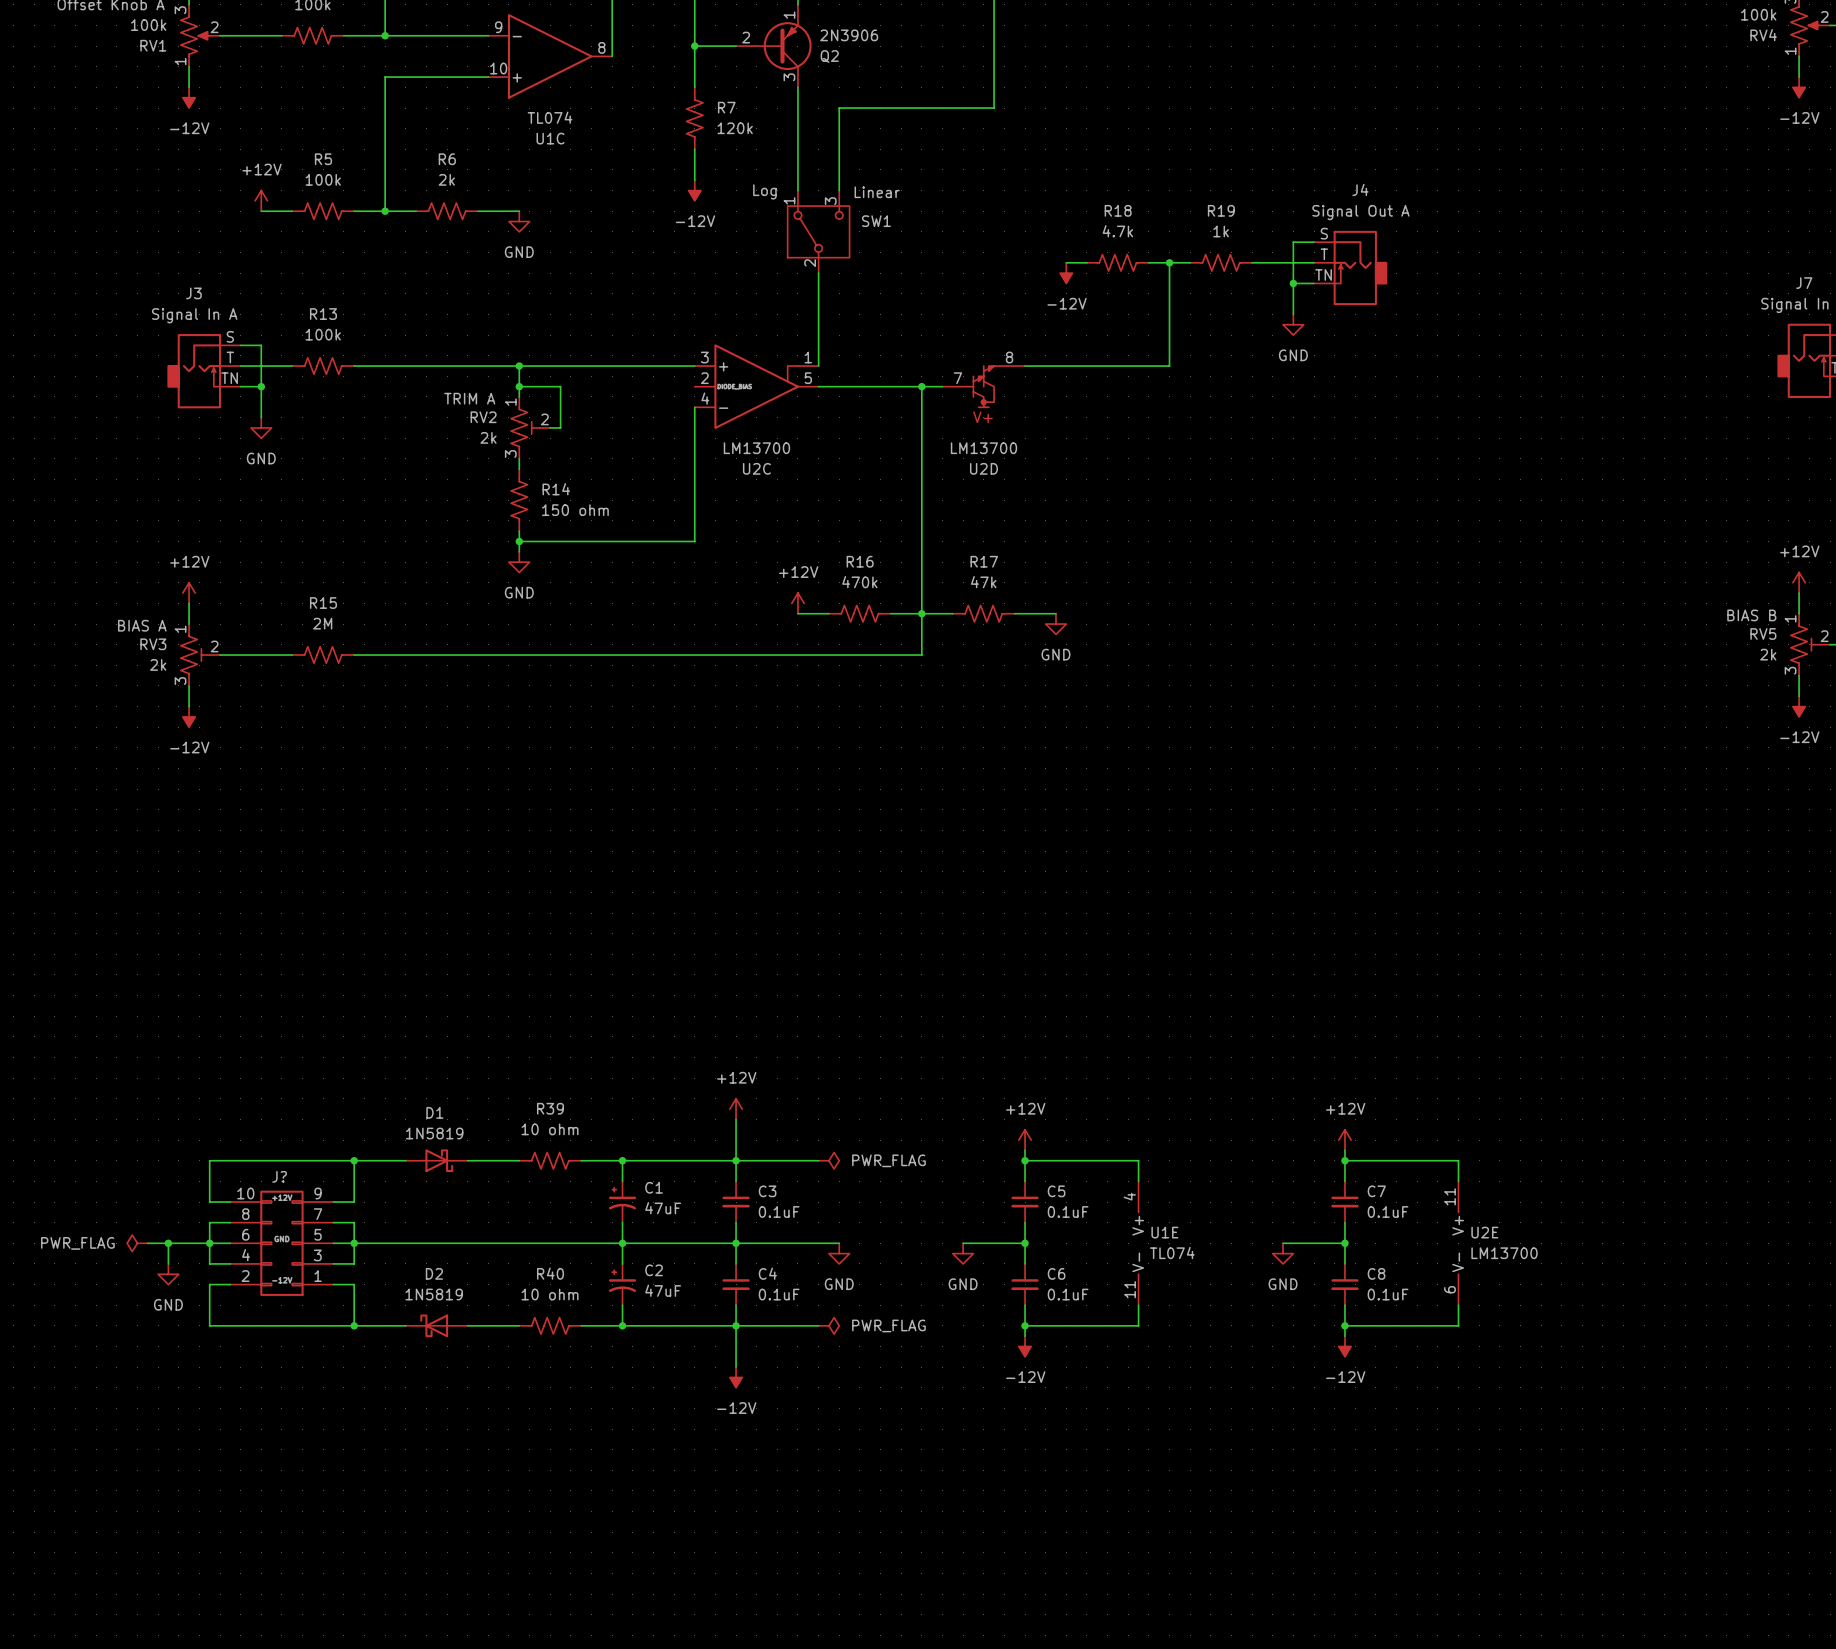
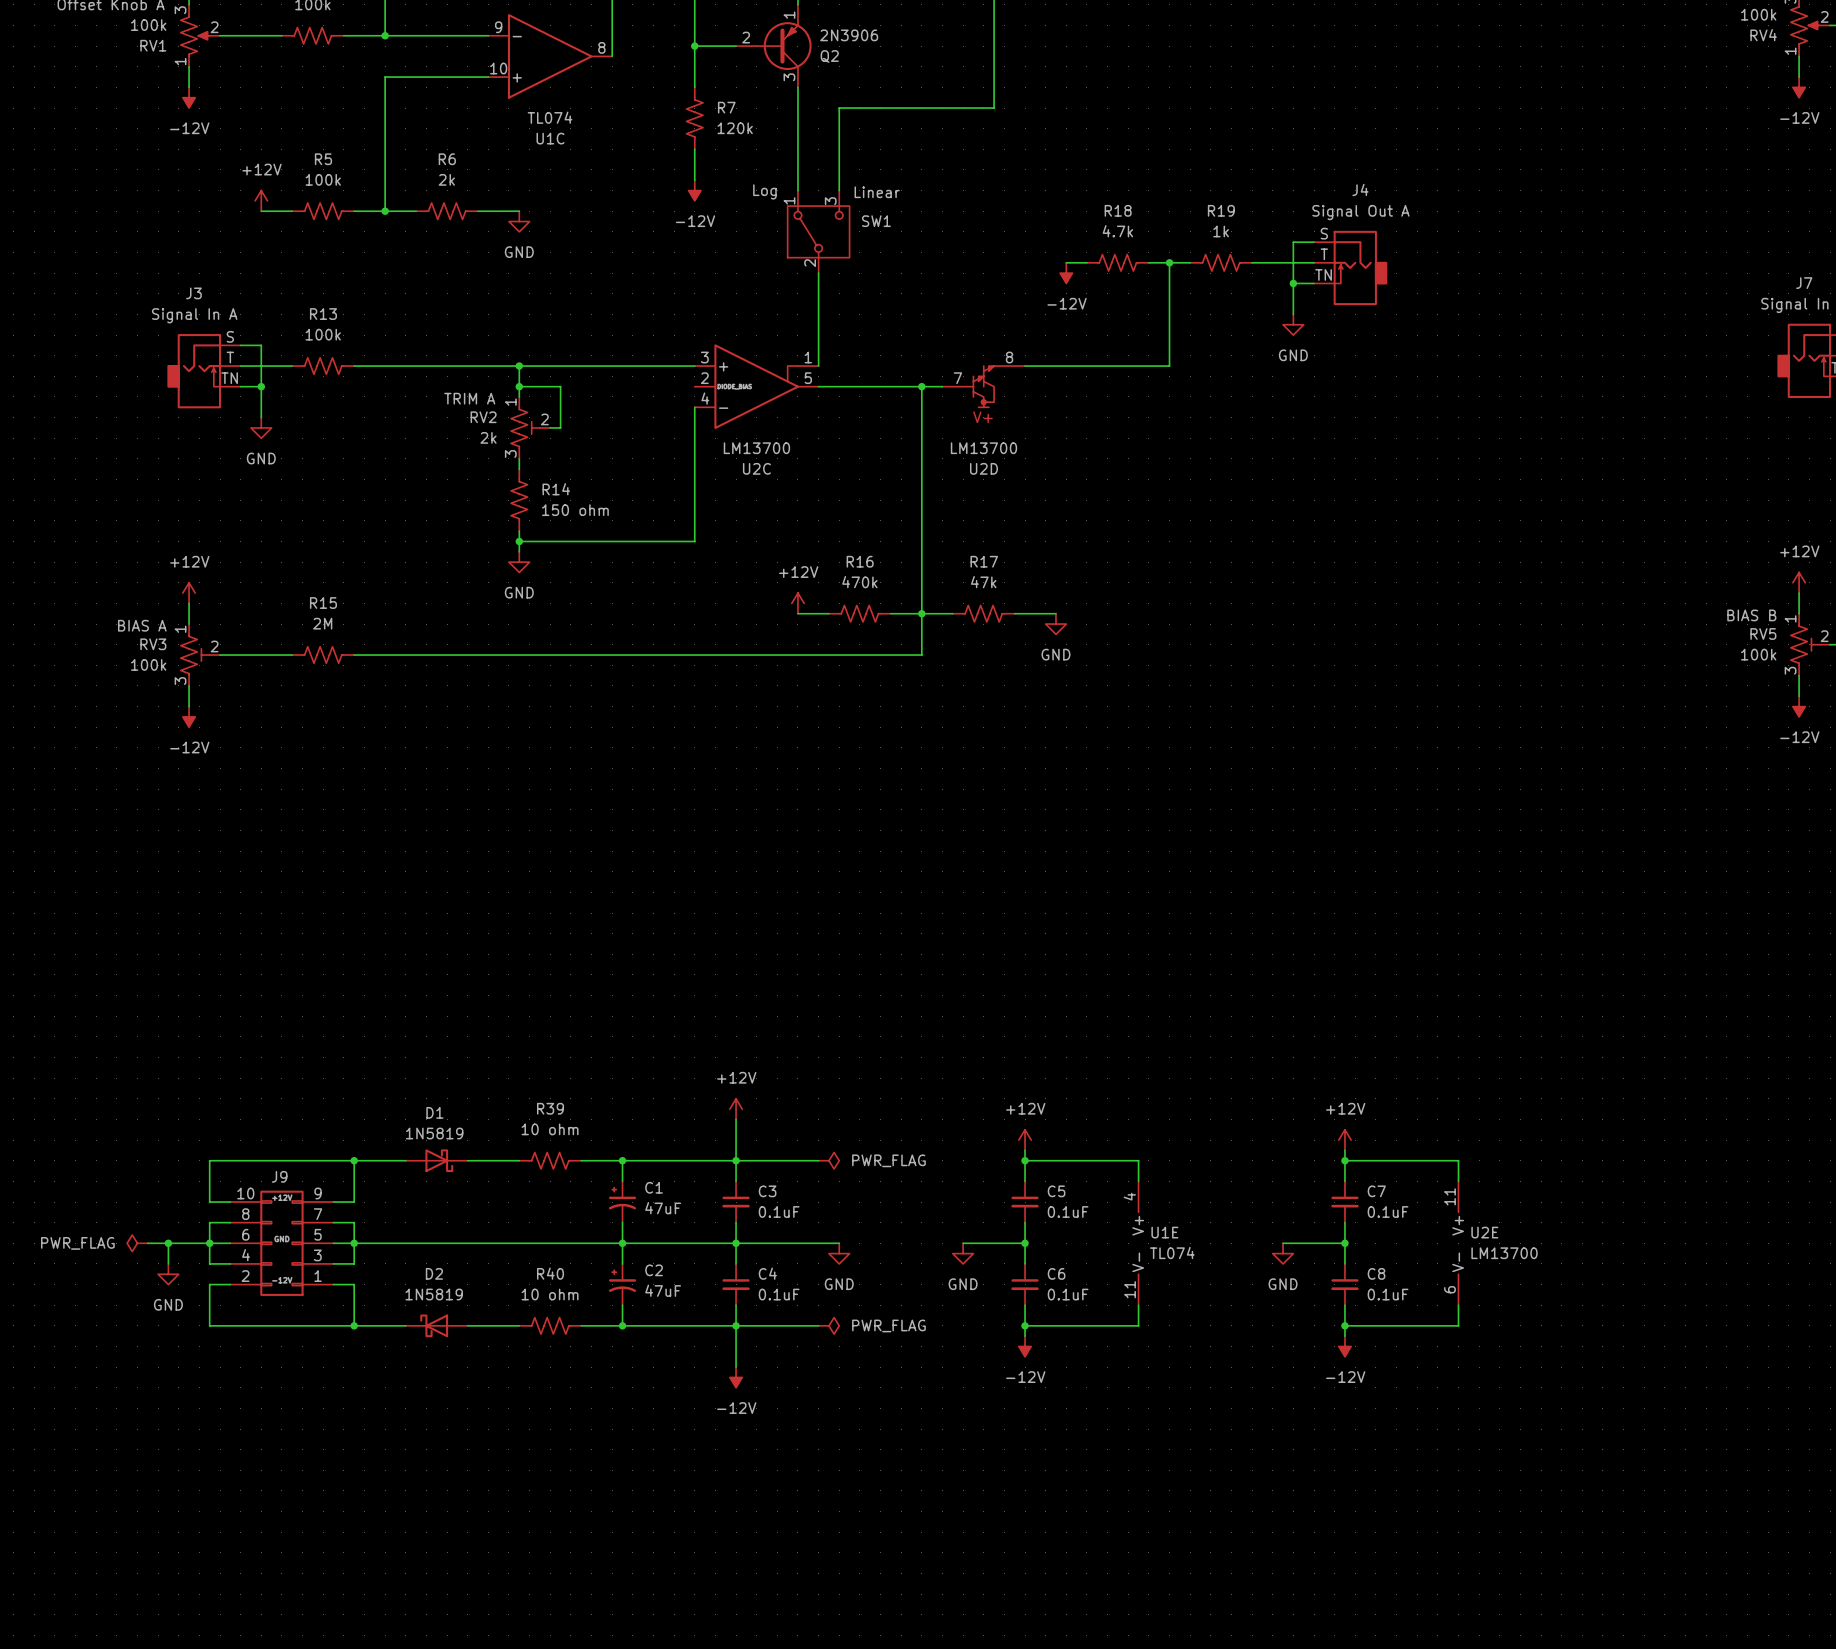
RV5 value: 2k (1768, 654) -> 100k (1758, 654)
RV3 value: 2k (158, 664) -> 100k (148, 664)
J? name: J? (279, 1176) -> J9 (279, 1176)

